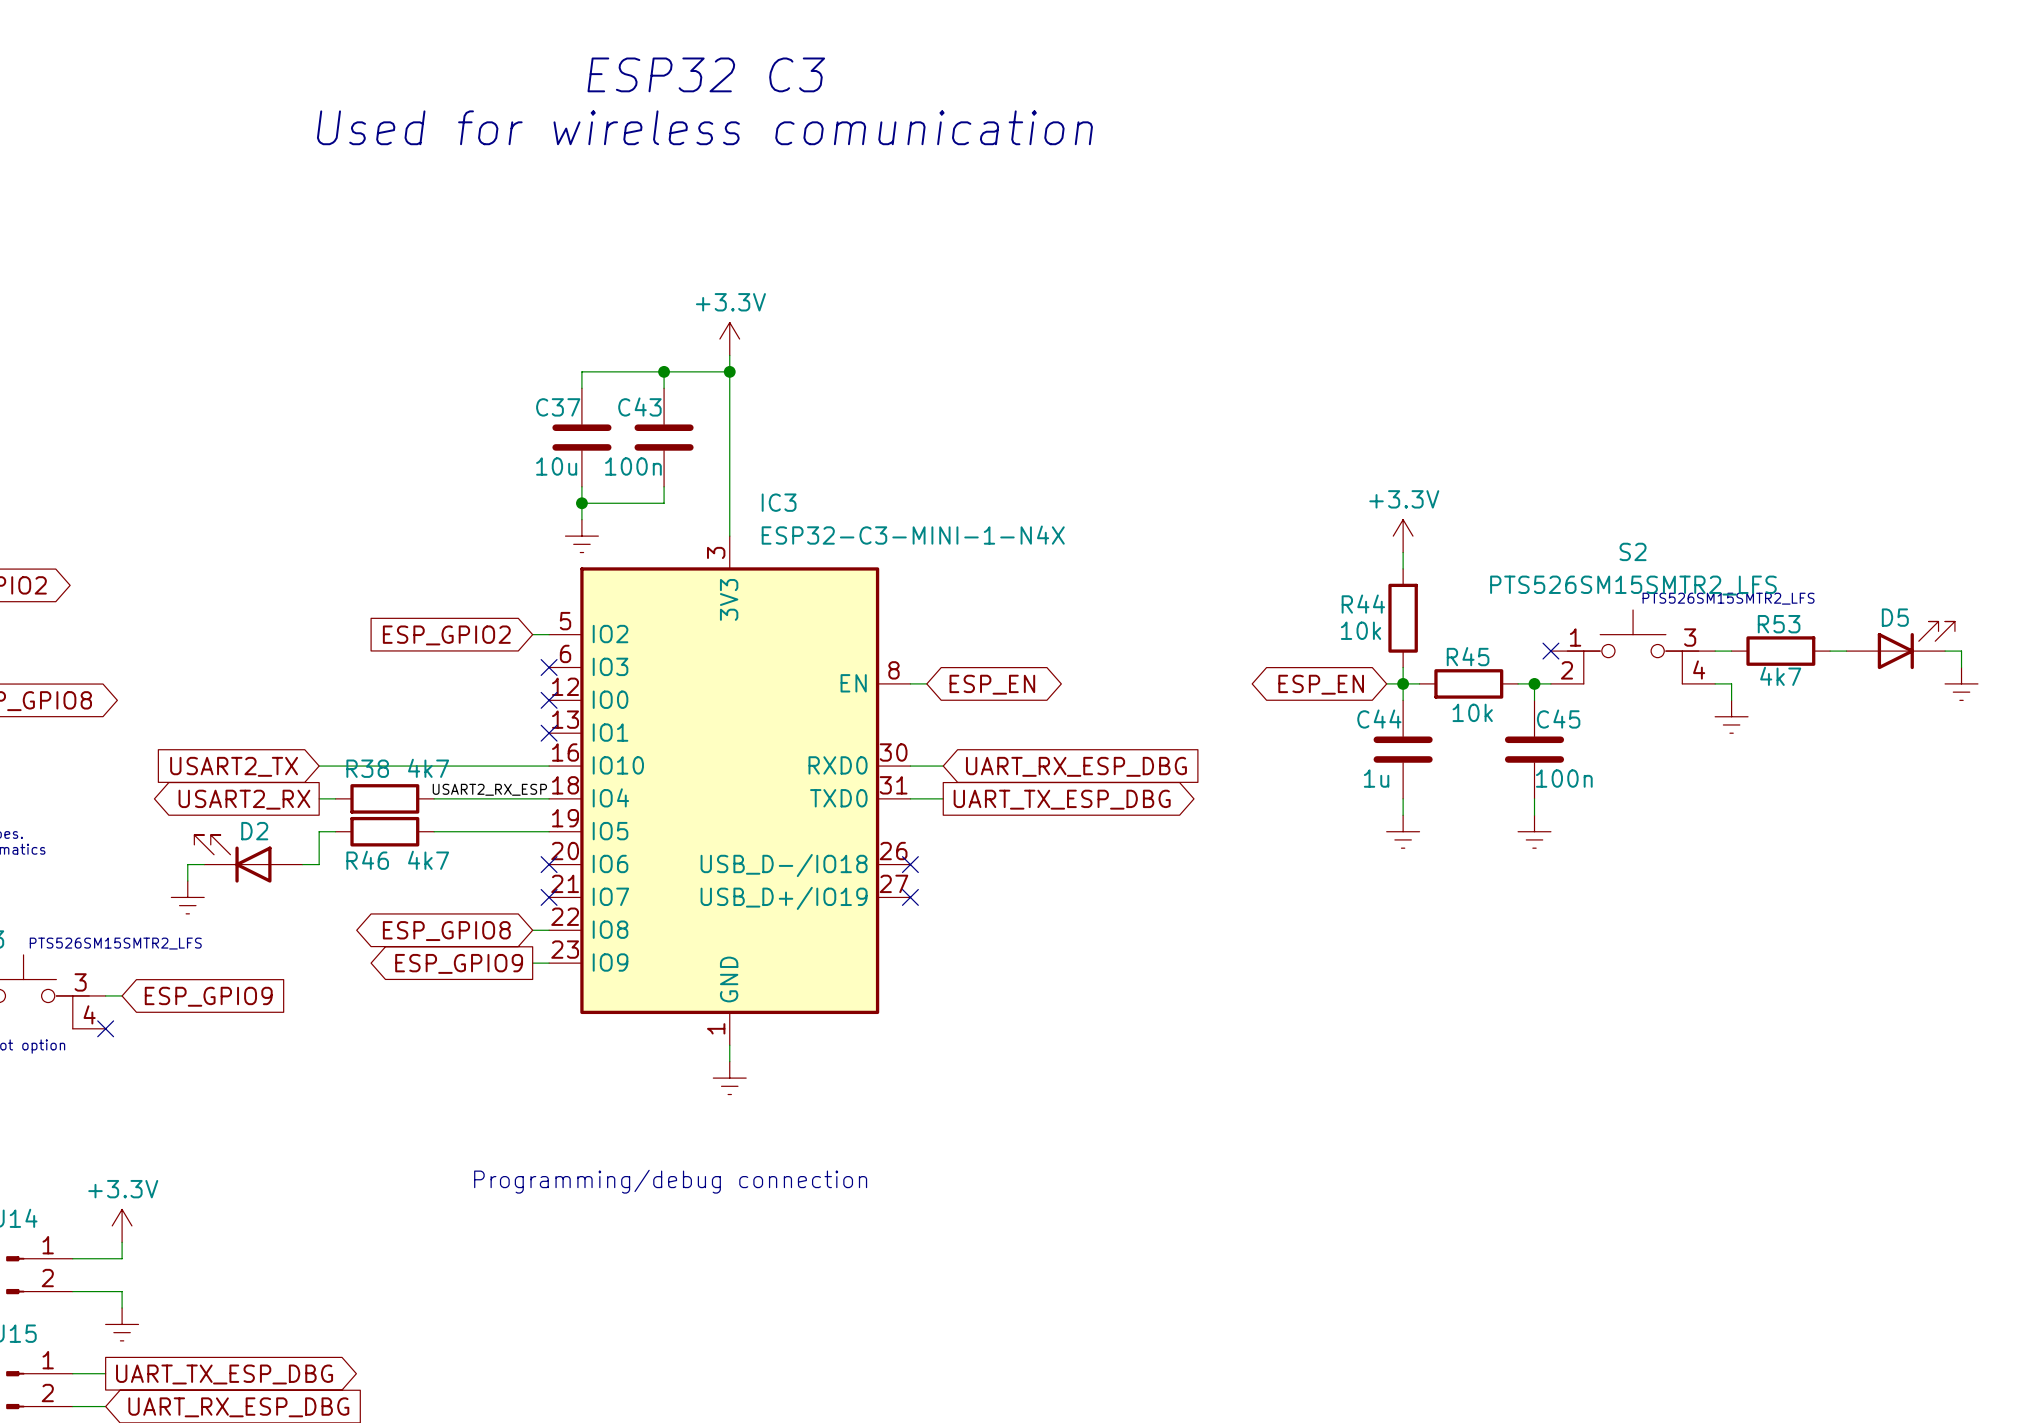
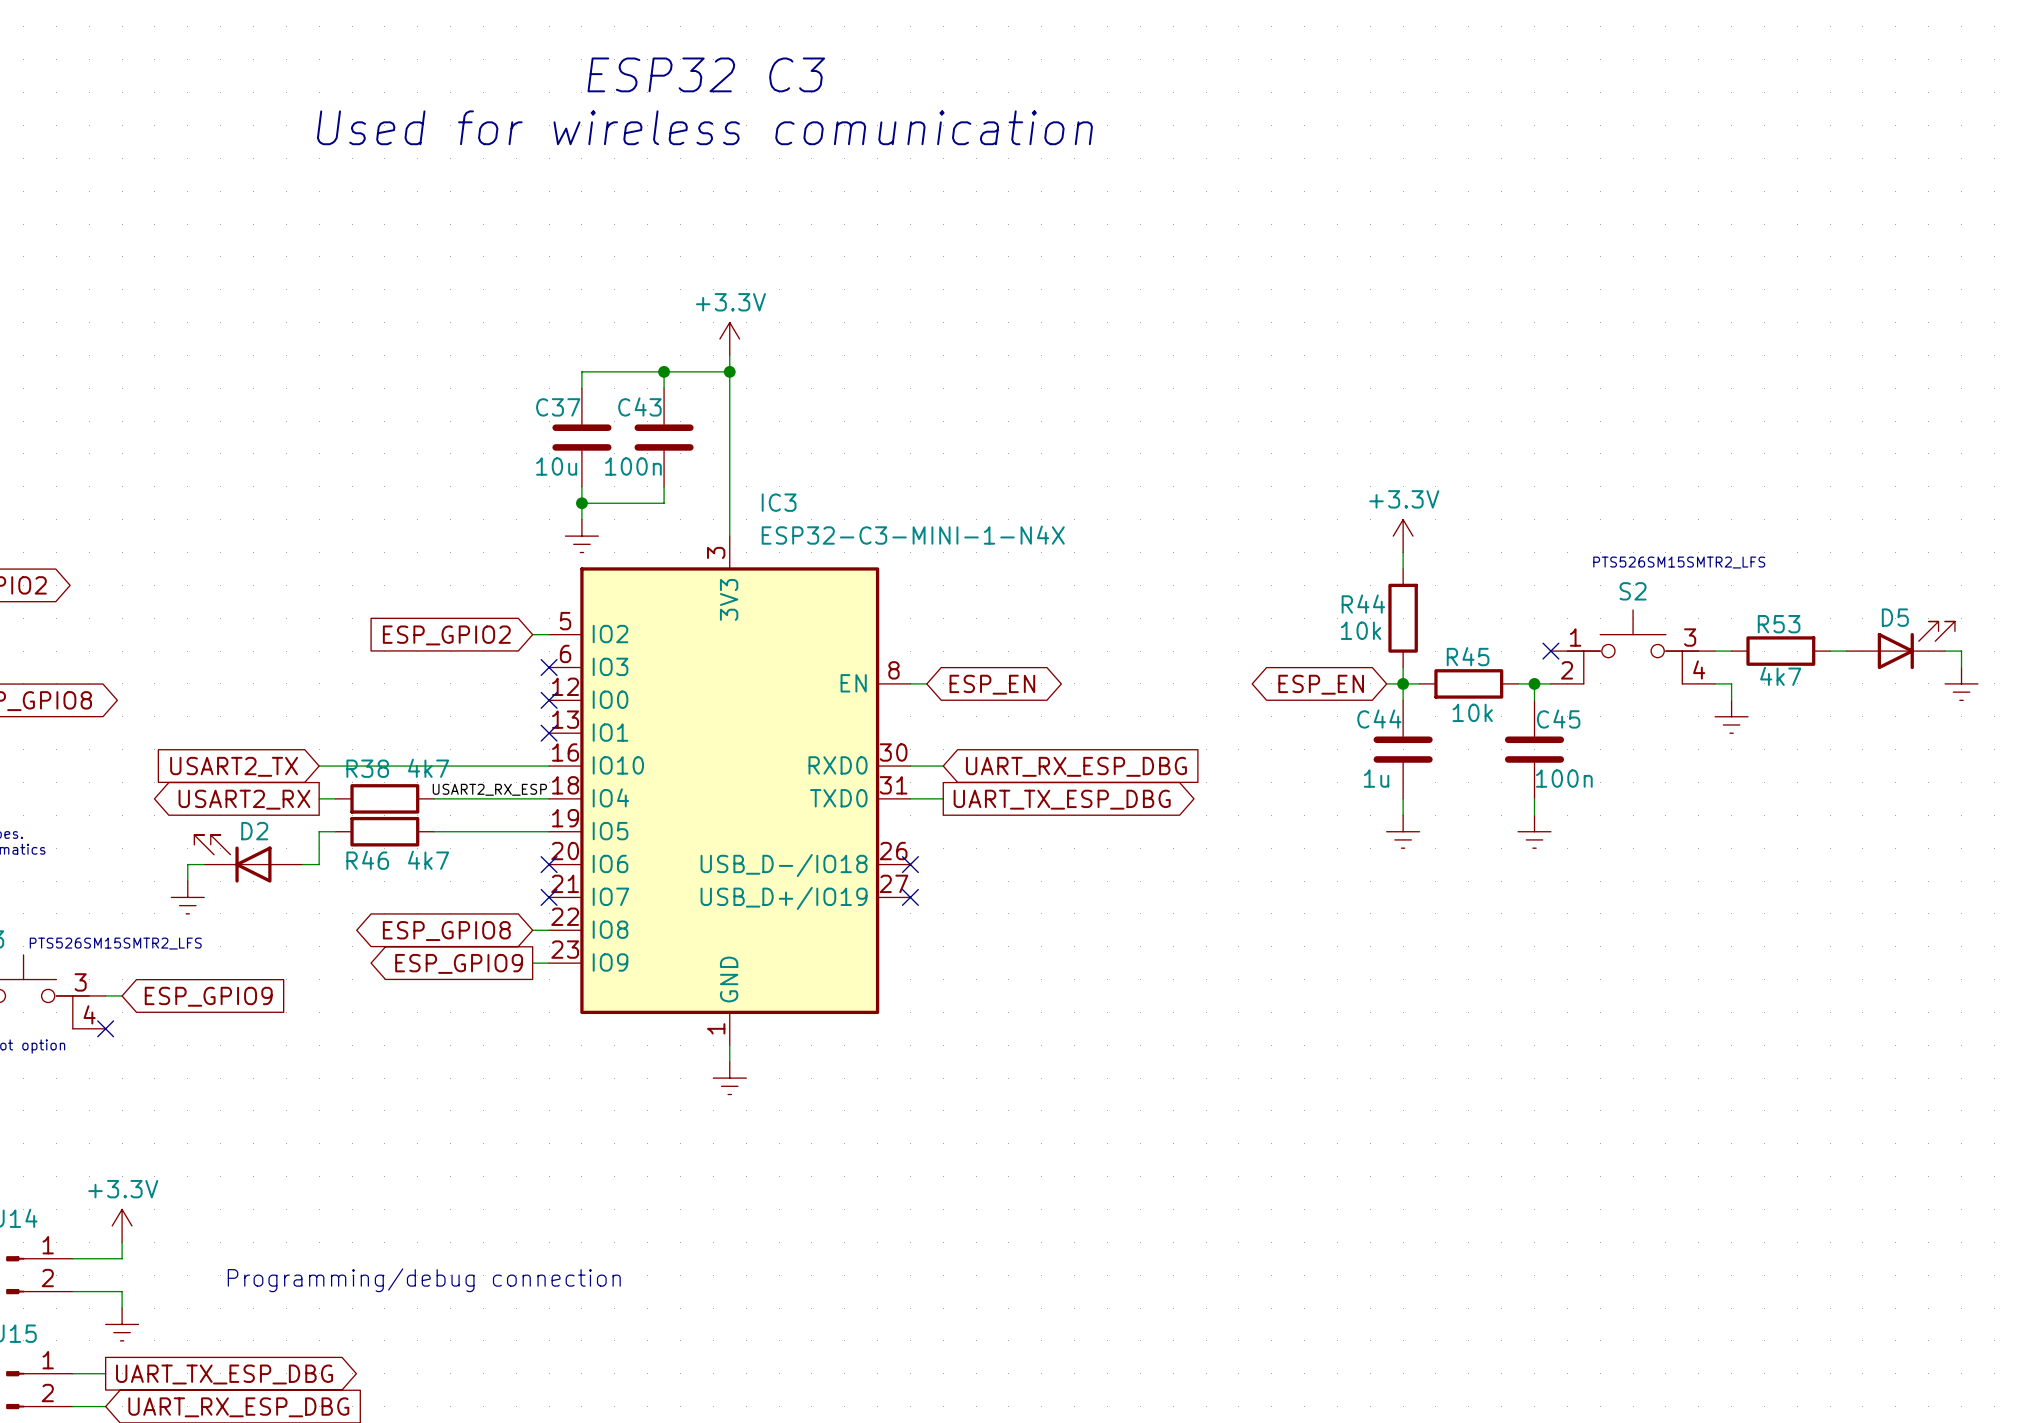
S2 name position: S2 (1633, 551) -> S2 (1633, 591)
S2 value: PTS526SM15SMTR2_LFS (1633, 585) -> none
text position: PTS526SM15SMTR2_LFS (1728, 598) -> PTS526SM15SMTR2_LFS (1679, 562)
text position: Programming/debug connection (670, 1181) -> Programming/debug connection (424, 1280)

